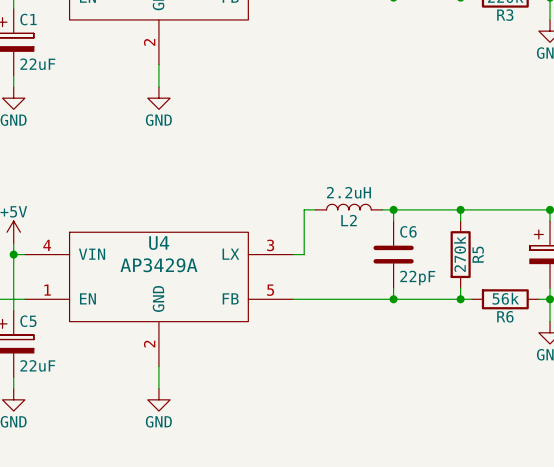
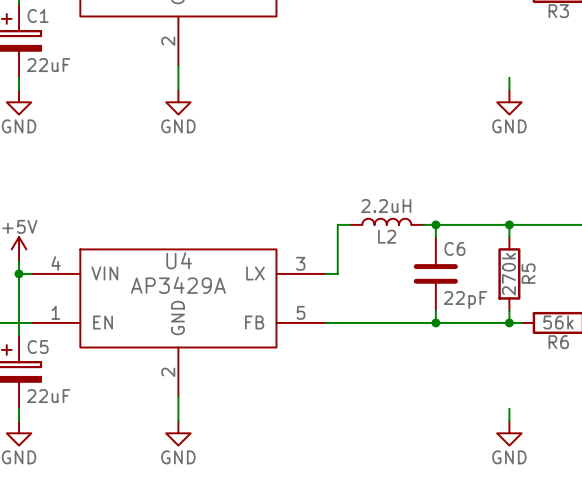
wire: none -> (509, 77) (509, 90)
power symbol: none -> GND (509, 102)
wire: none -> (509, 408) (509, 421)
power symbol: none -> GND (509, 433)

